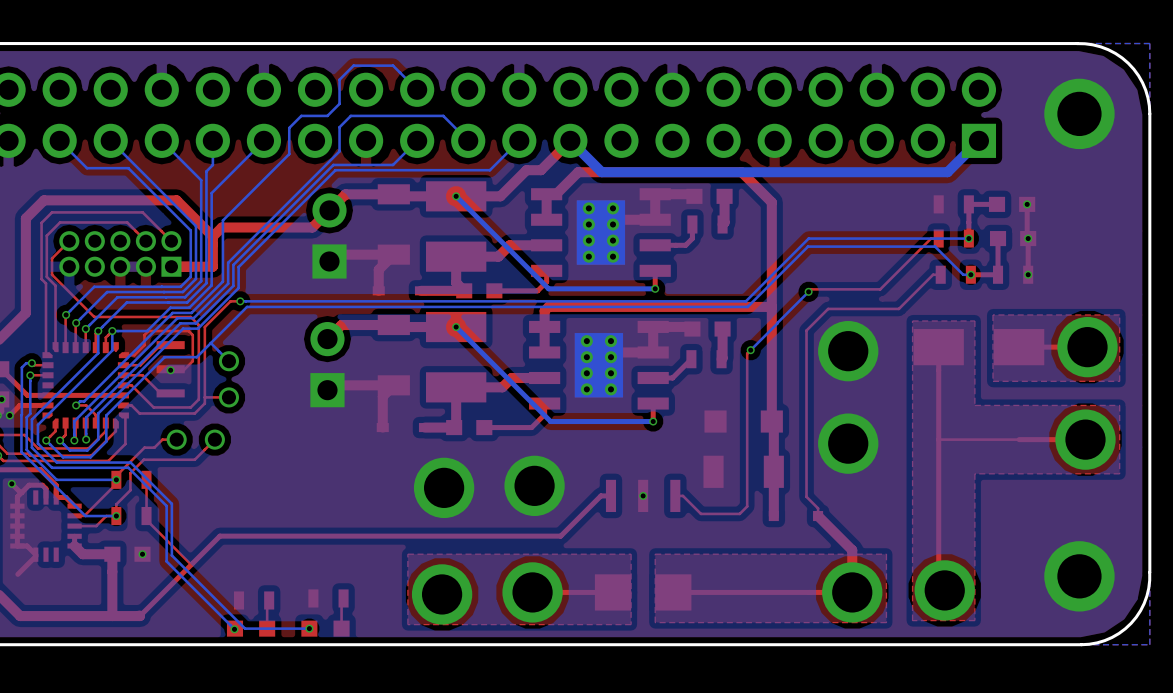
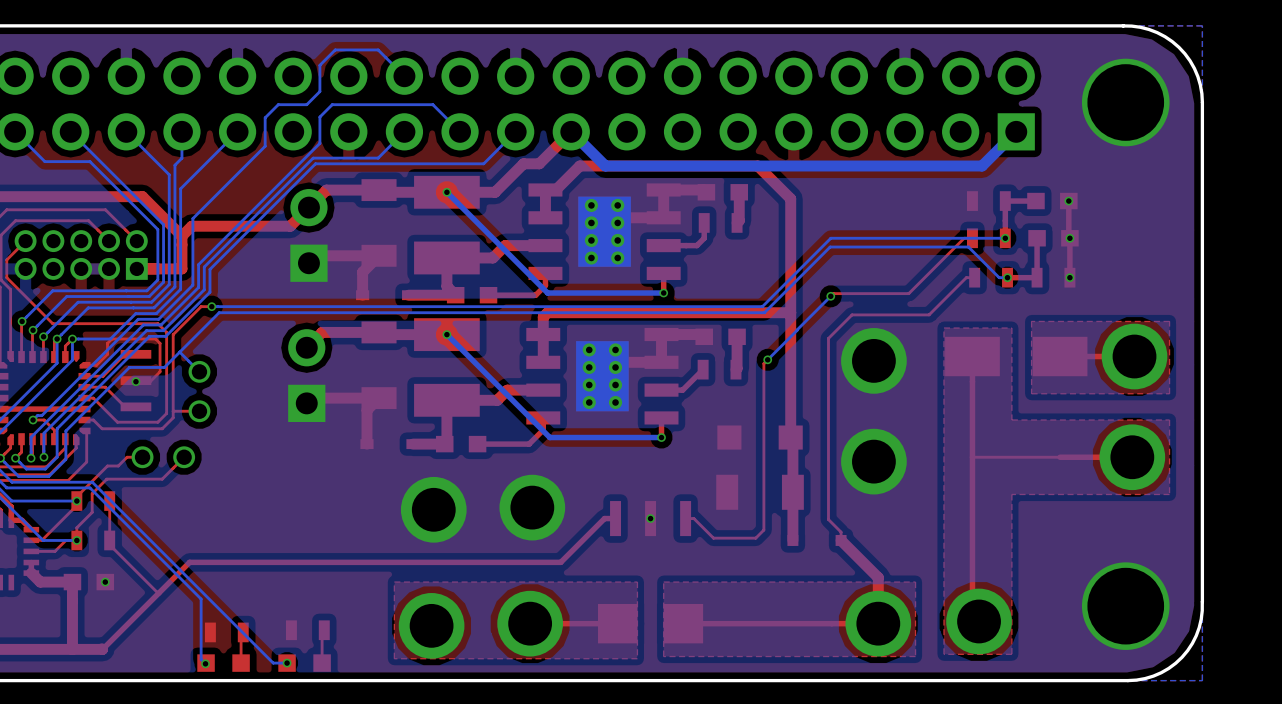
part footprint: [1044, 78, 1115, 150] -> [1081, 58, 1170, 147]
bottom track: (171, 503) (171, 555) (245, 628) (296, 628) -> (137, 527) (273, 663)
bottom track: (166, 505) (166, 561) (230, 625) -> (131, 529) (201, 599) (201, 659)
part footprint: [1044, 541, 1115, 612] -> [1081, 562, 1170, 650]

